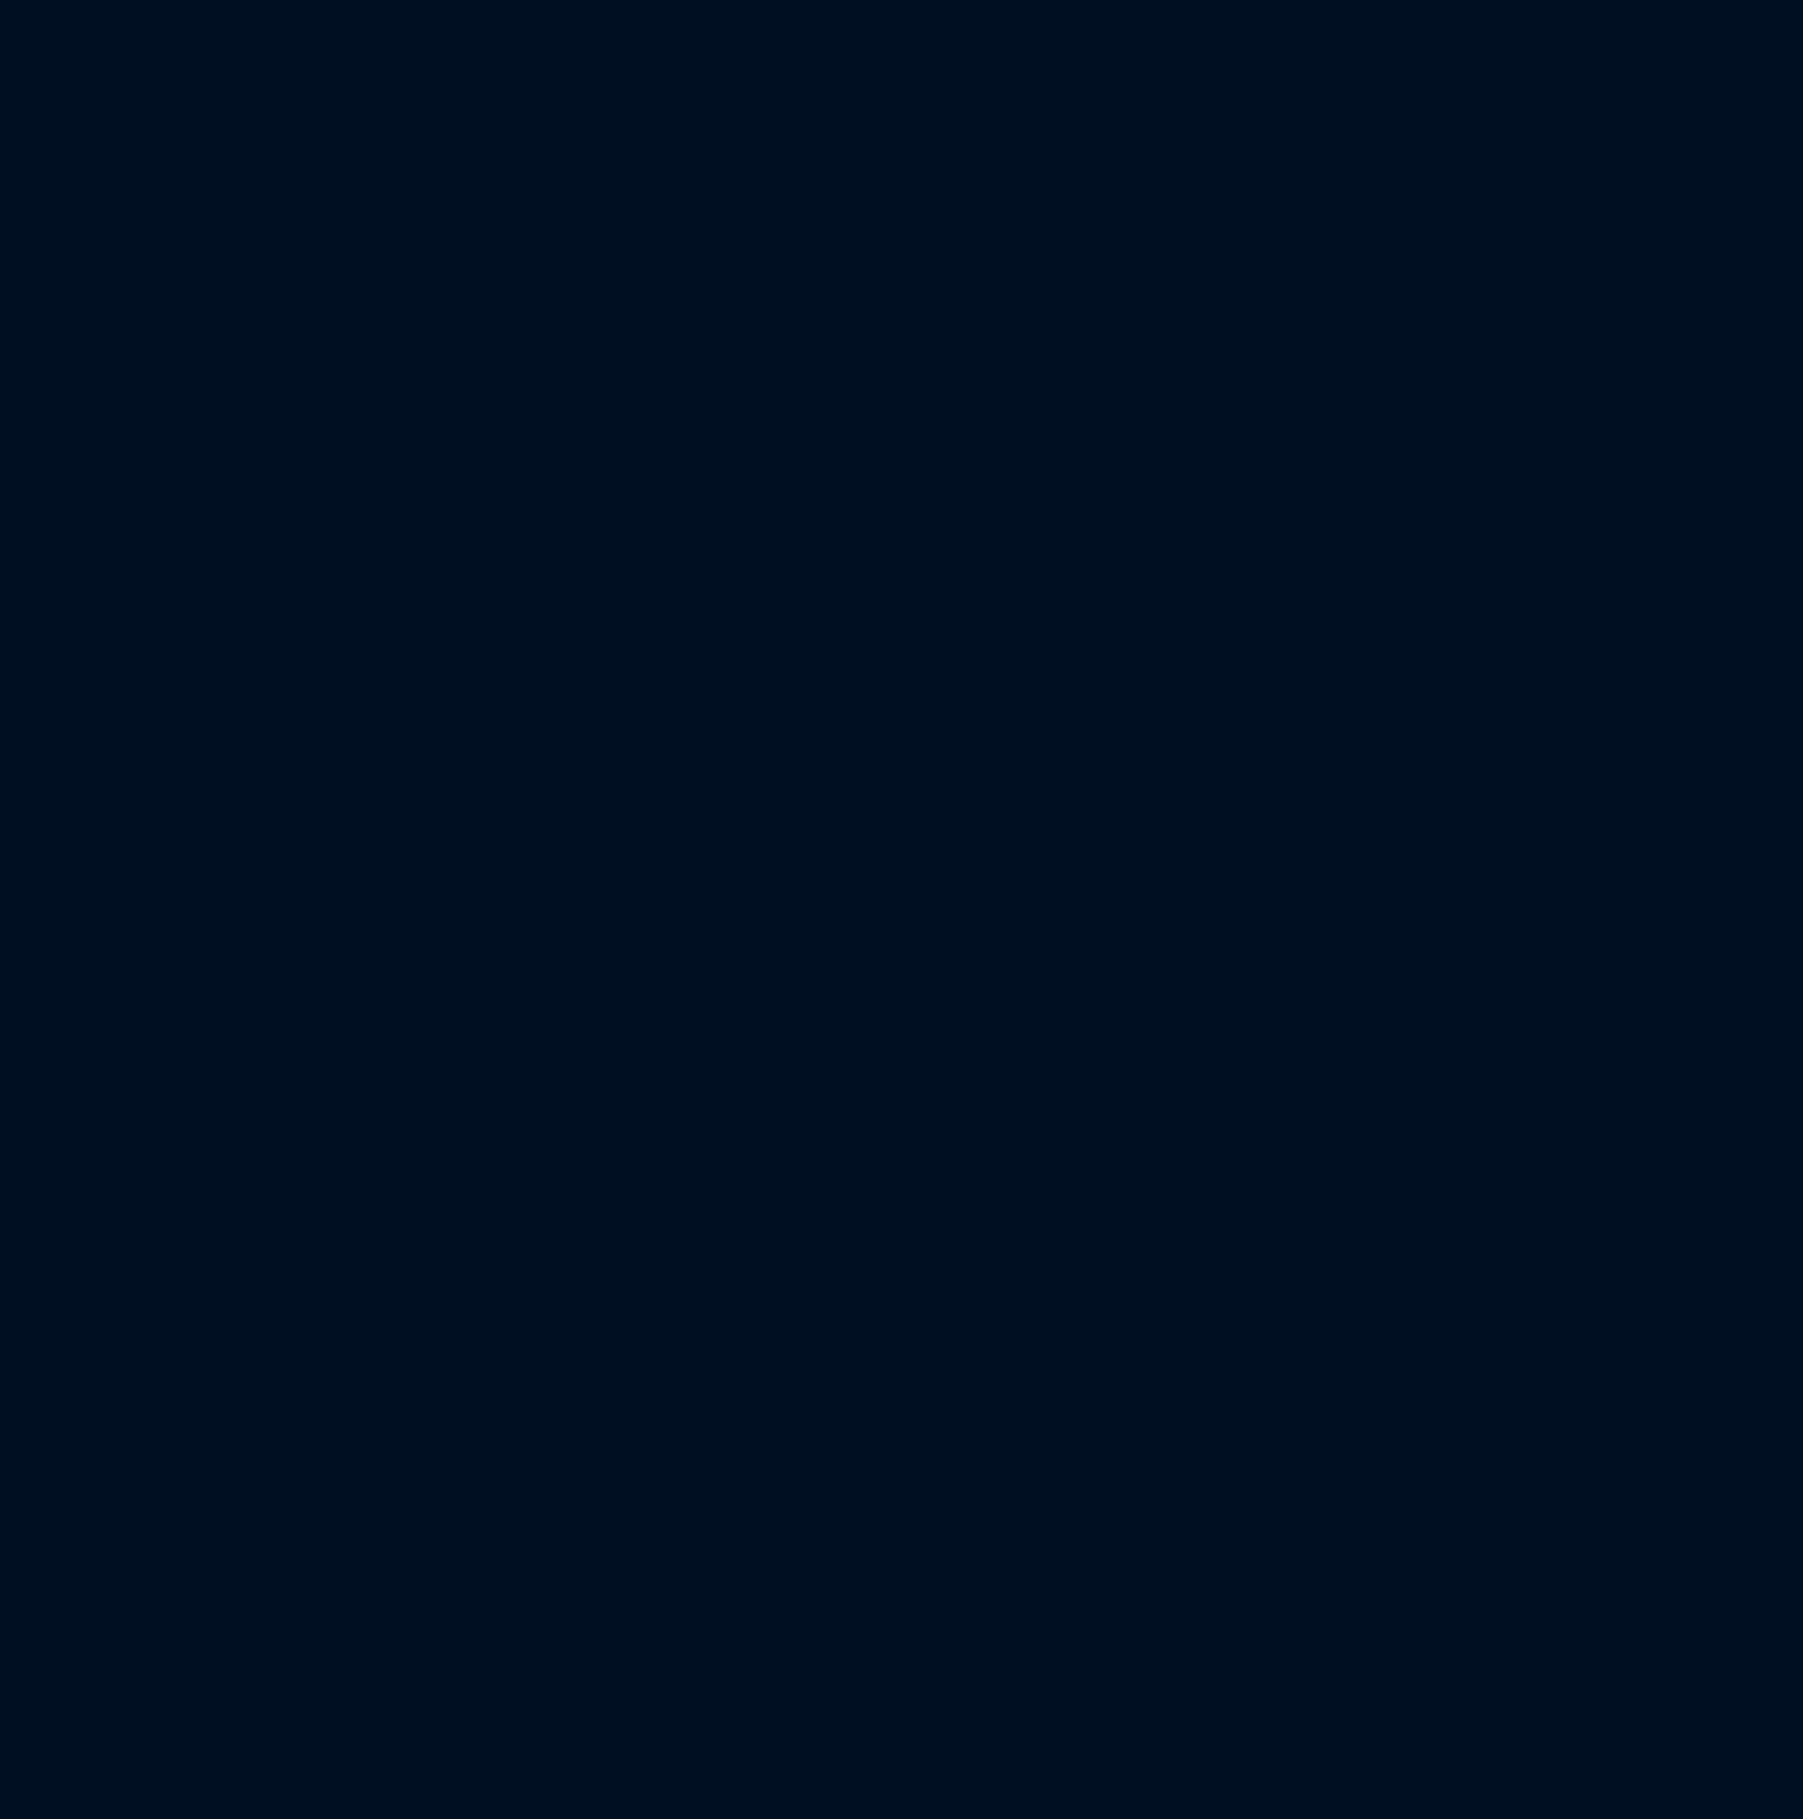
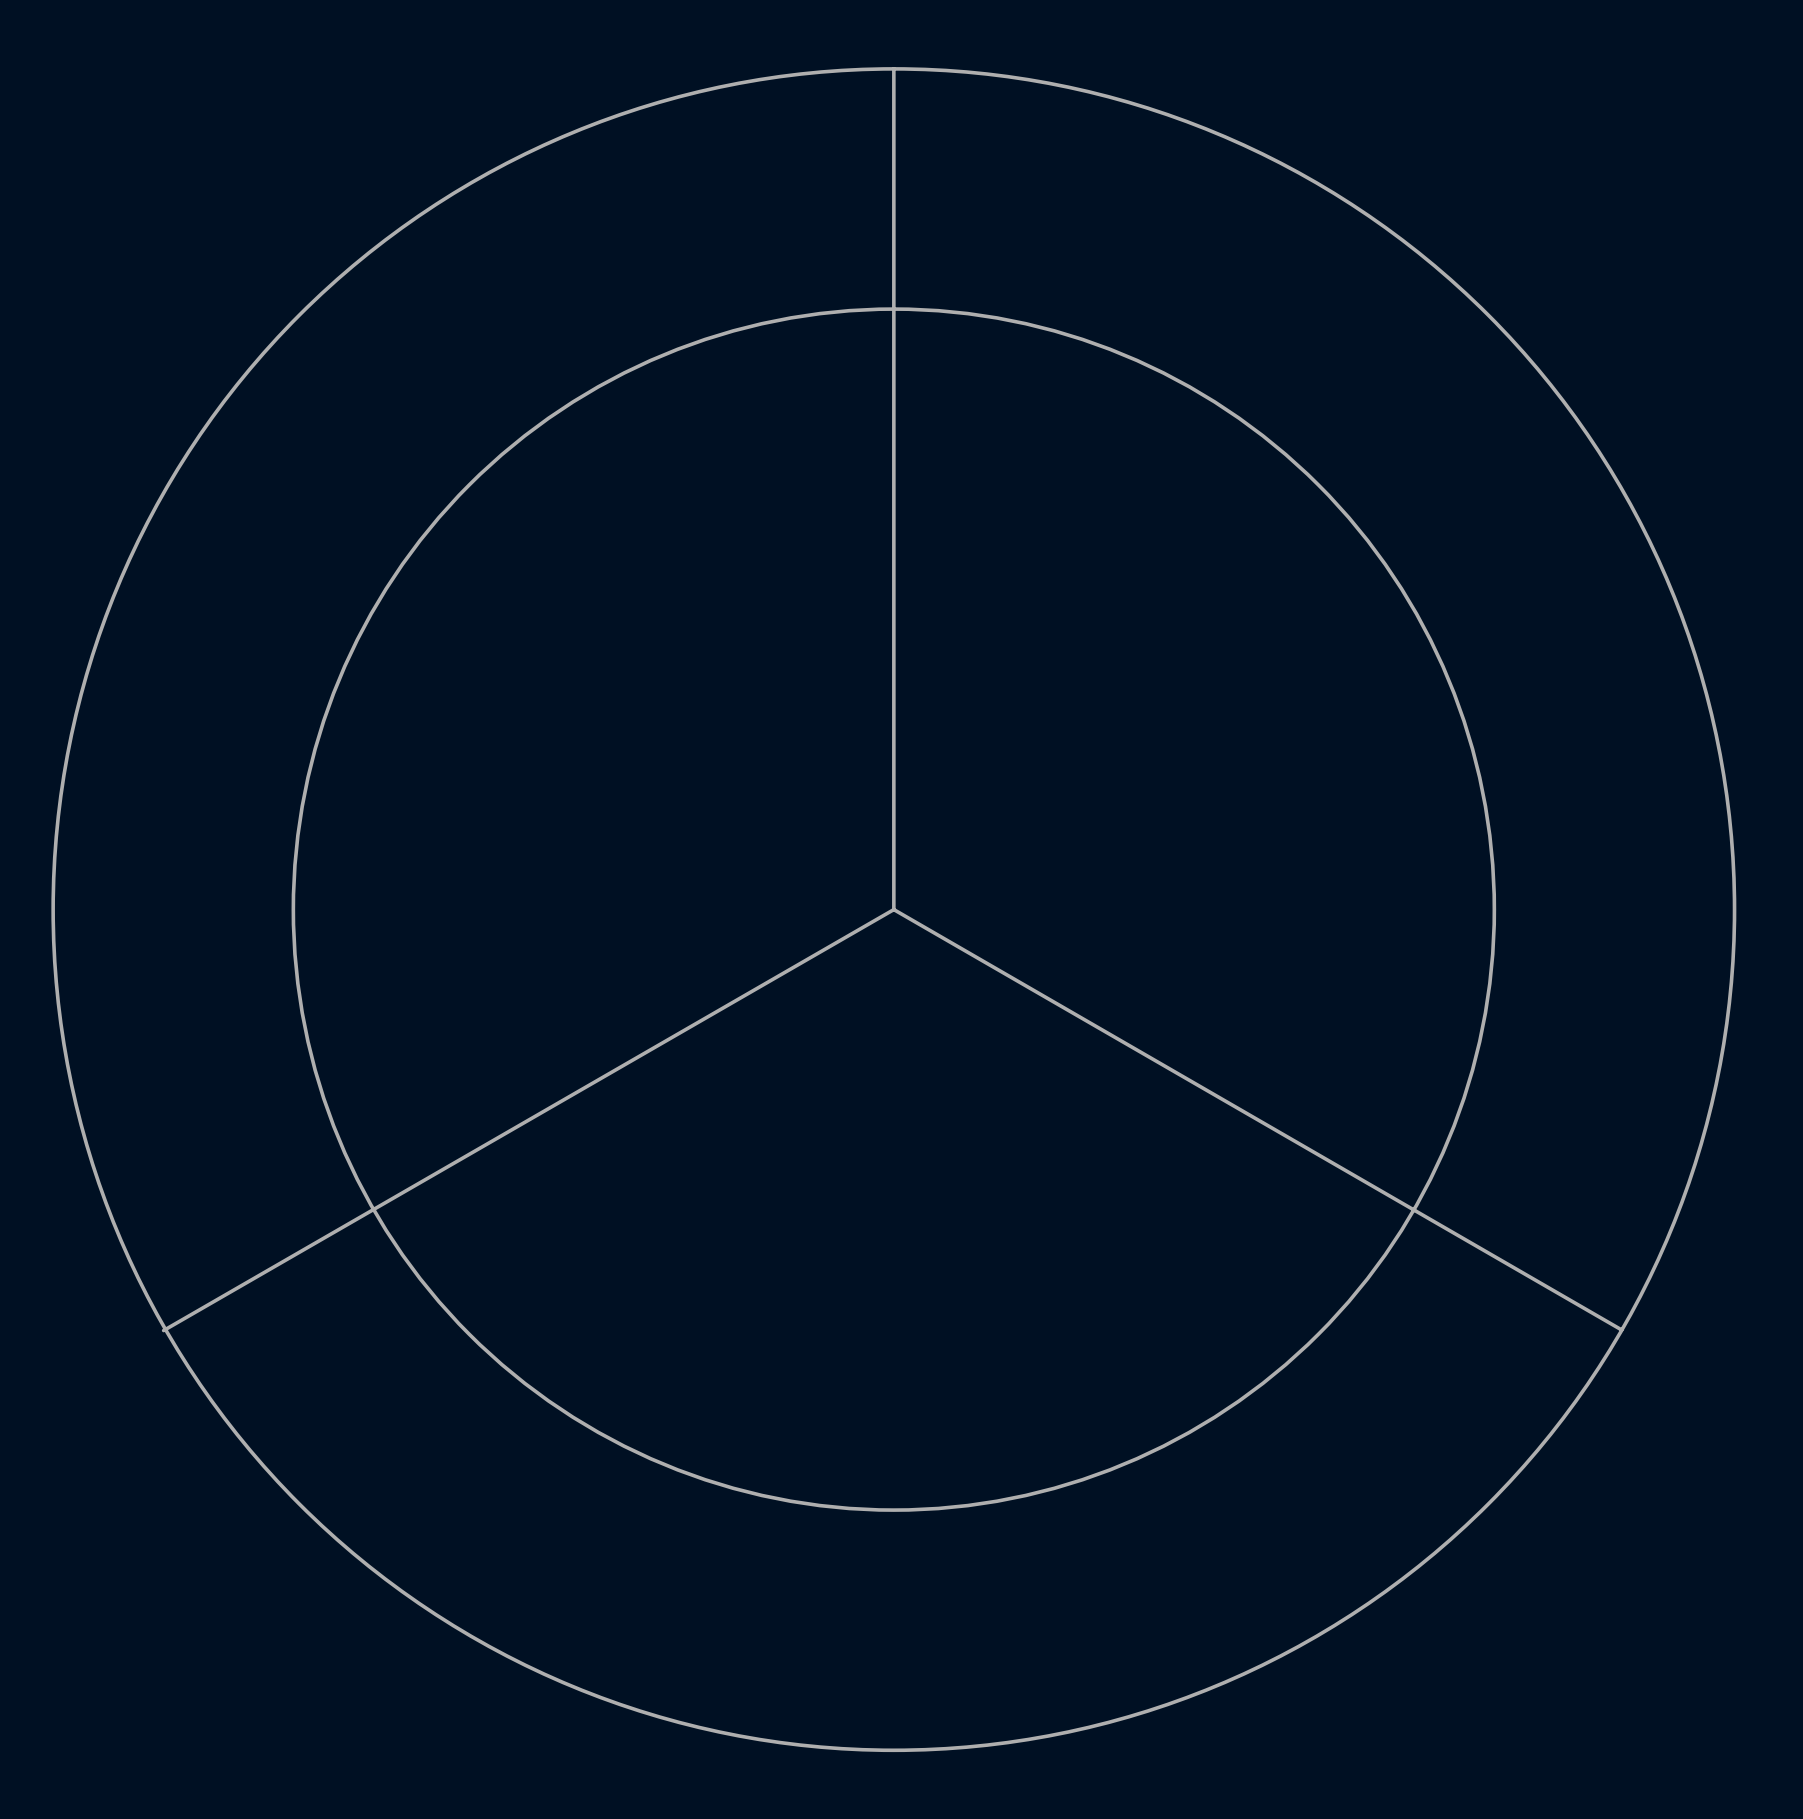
drawing: none -> [51, 67, 1737, 1753]
line: none -> (893, 68) (893, 909)
line: none -> (893, 909) (163, 1330)
line: none -> (893, 909) (1621, 1329)

